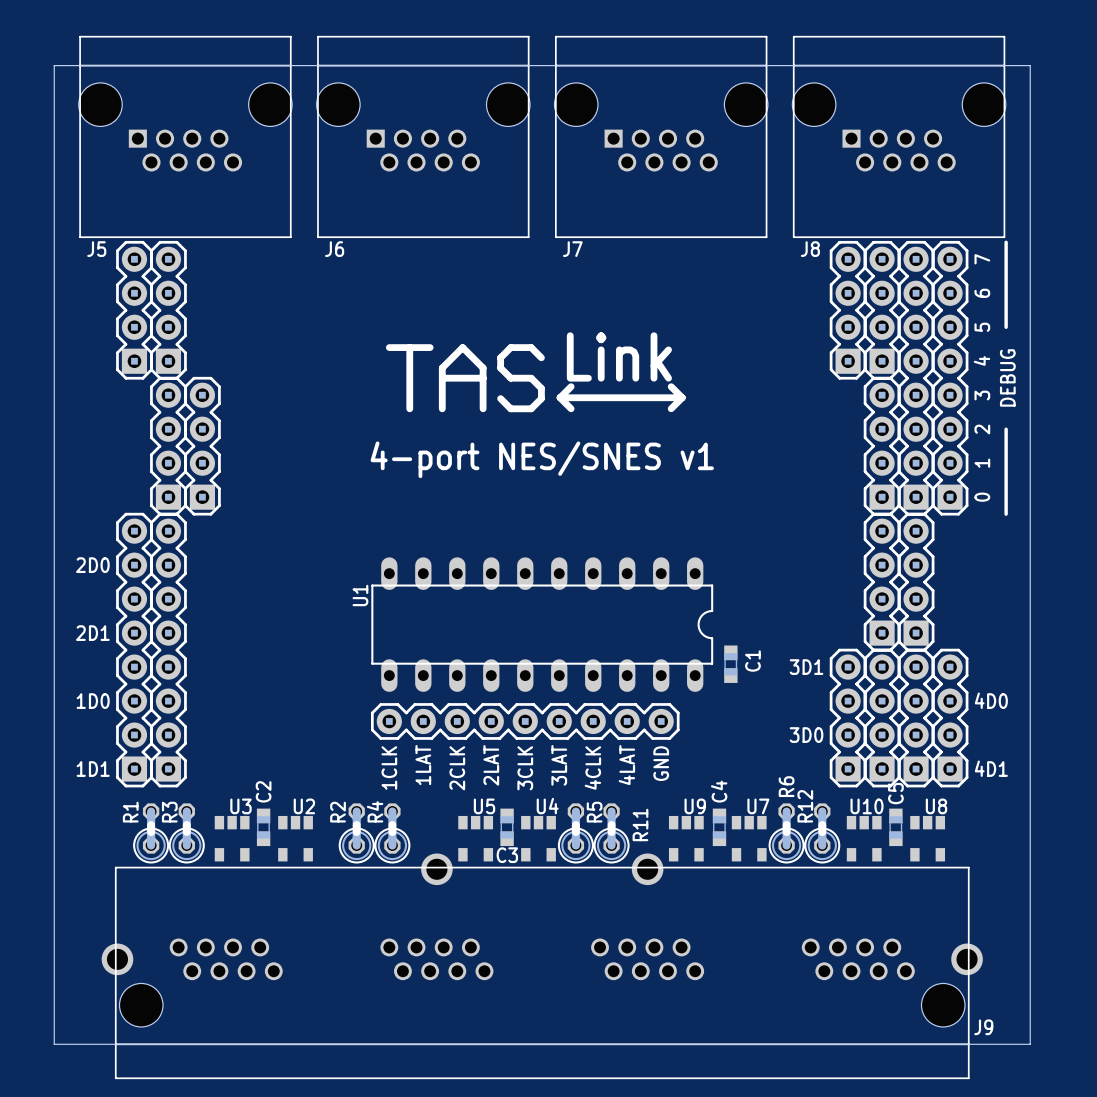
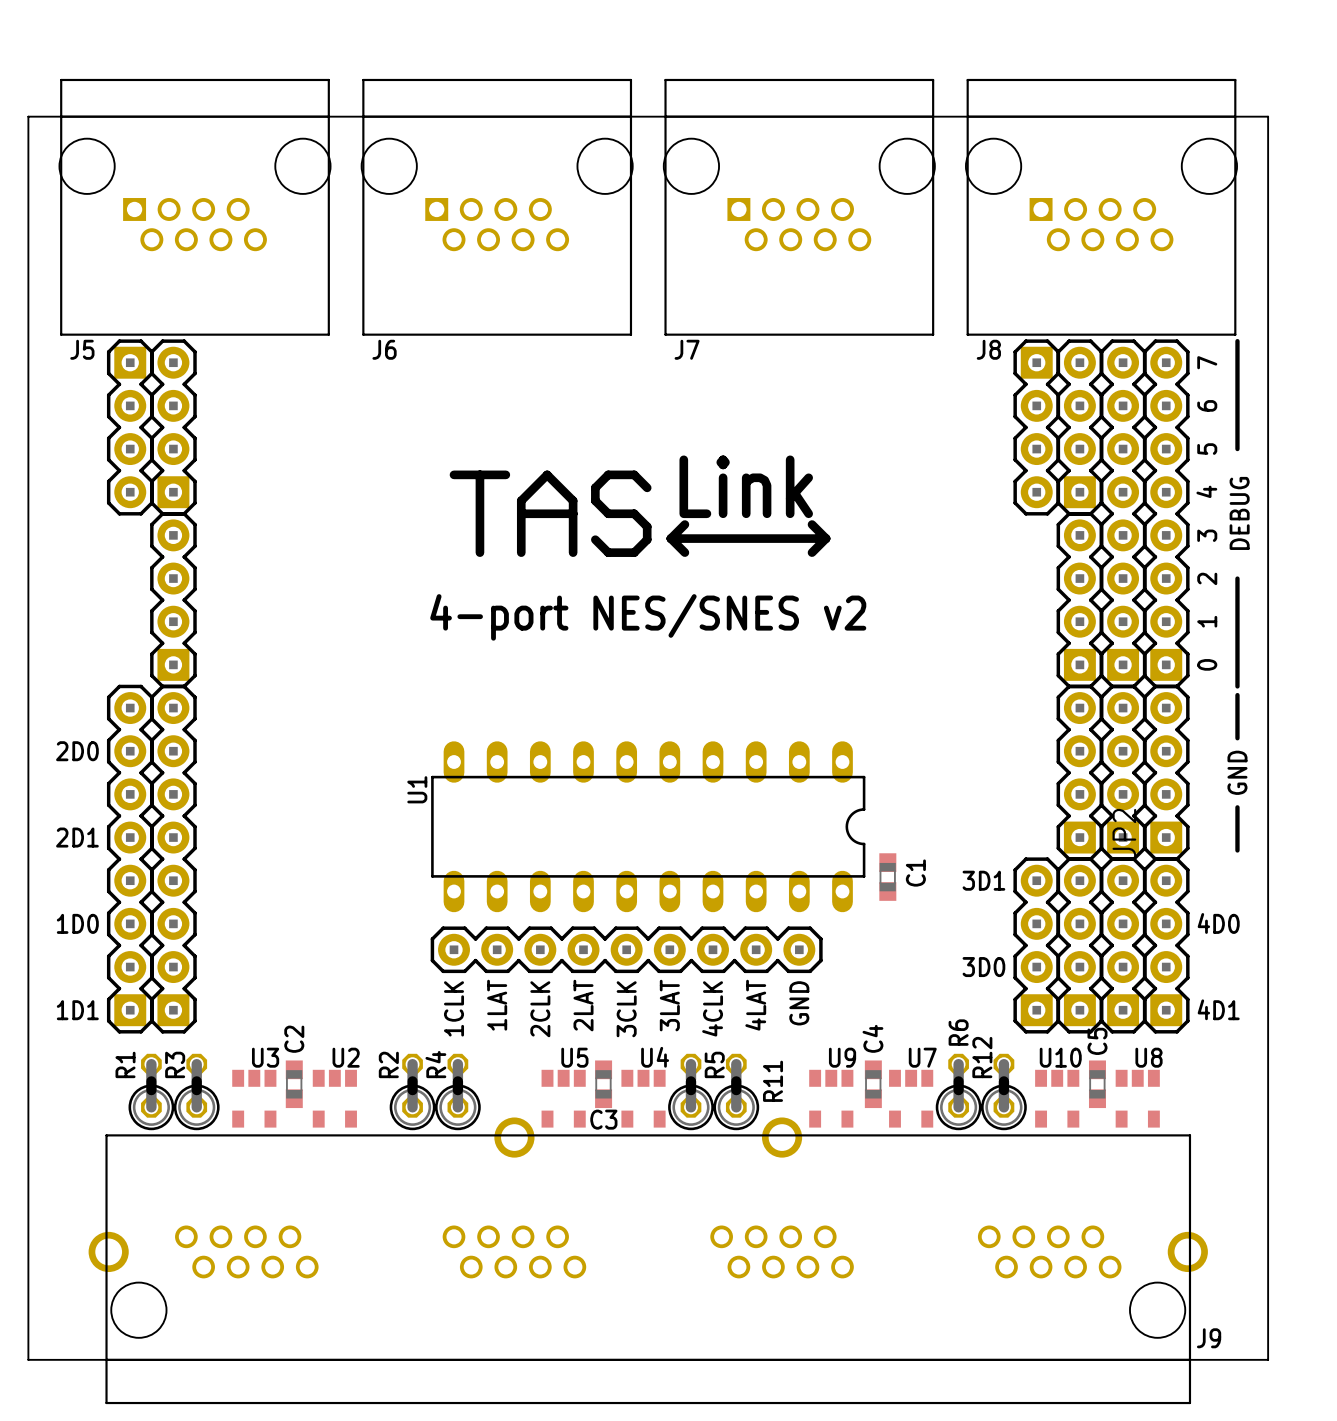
part rotation: 0° (134, 310) -> 180° (130, 427)
part rotation: 0° (848, 310) -> 180° (1036, 427)
part: (202, 446) -> none
text: 4-port NES/SNES v1 (542, 459) -> 4-port NES/SNES v2 (648, 617)
line: none -> (1237, 695) (1237, 738)
JP2: none -> (1166, 772)
text: none -> GND (1237, 772)
line: none -> (1237, 807) (1237, 850)

